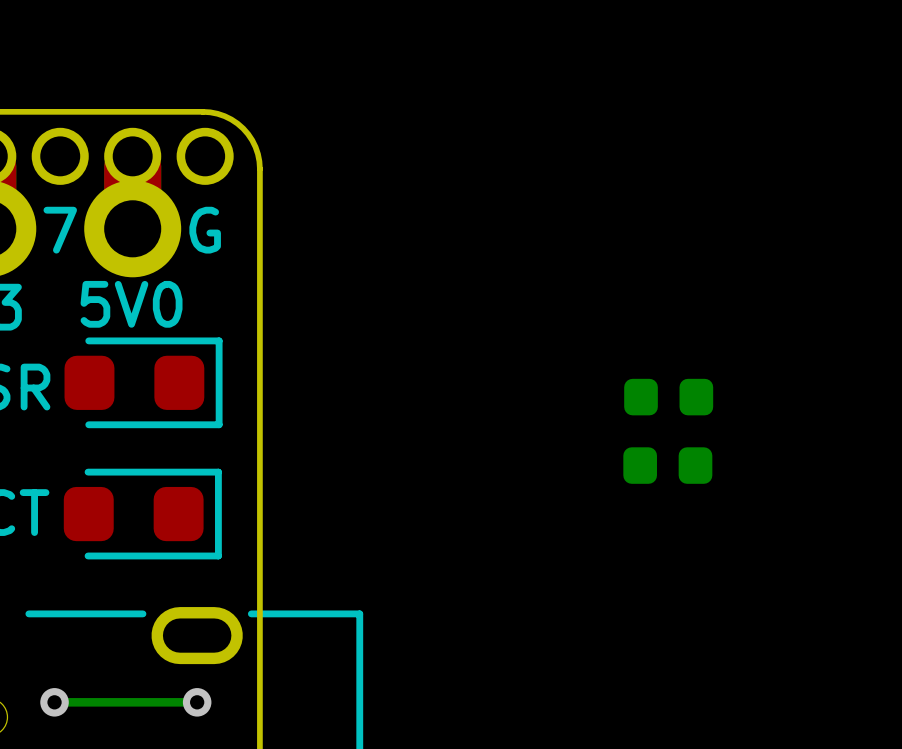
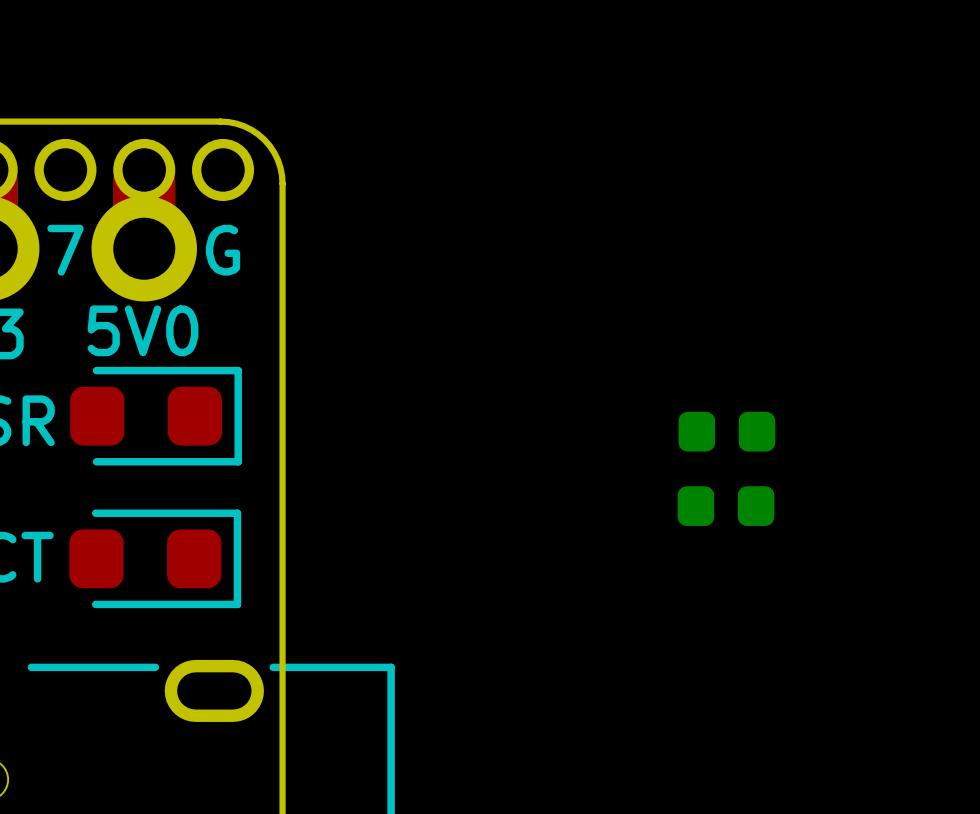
bottom track: (54, 702) (197, 702) -> none
via: (54, 702) -> none
via: (197, 702) -> none

